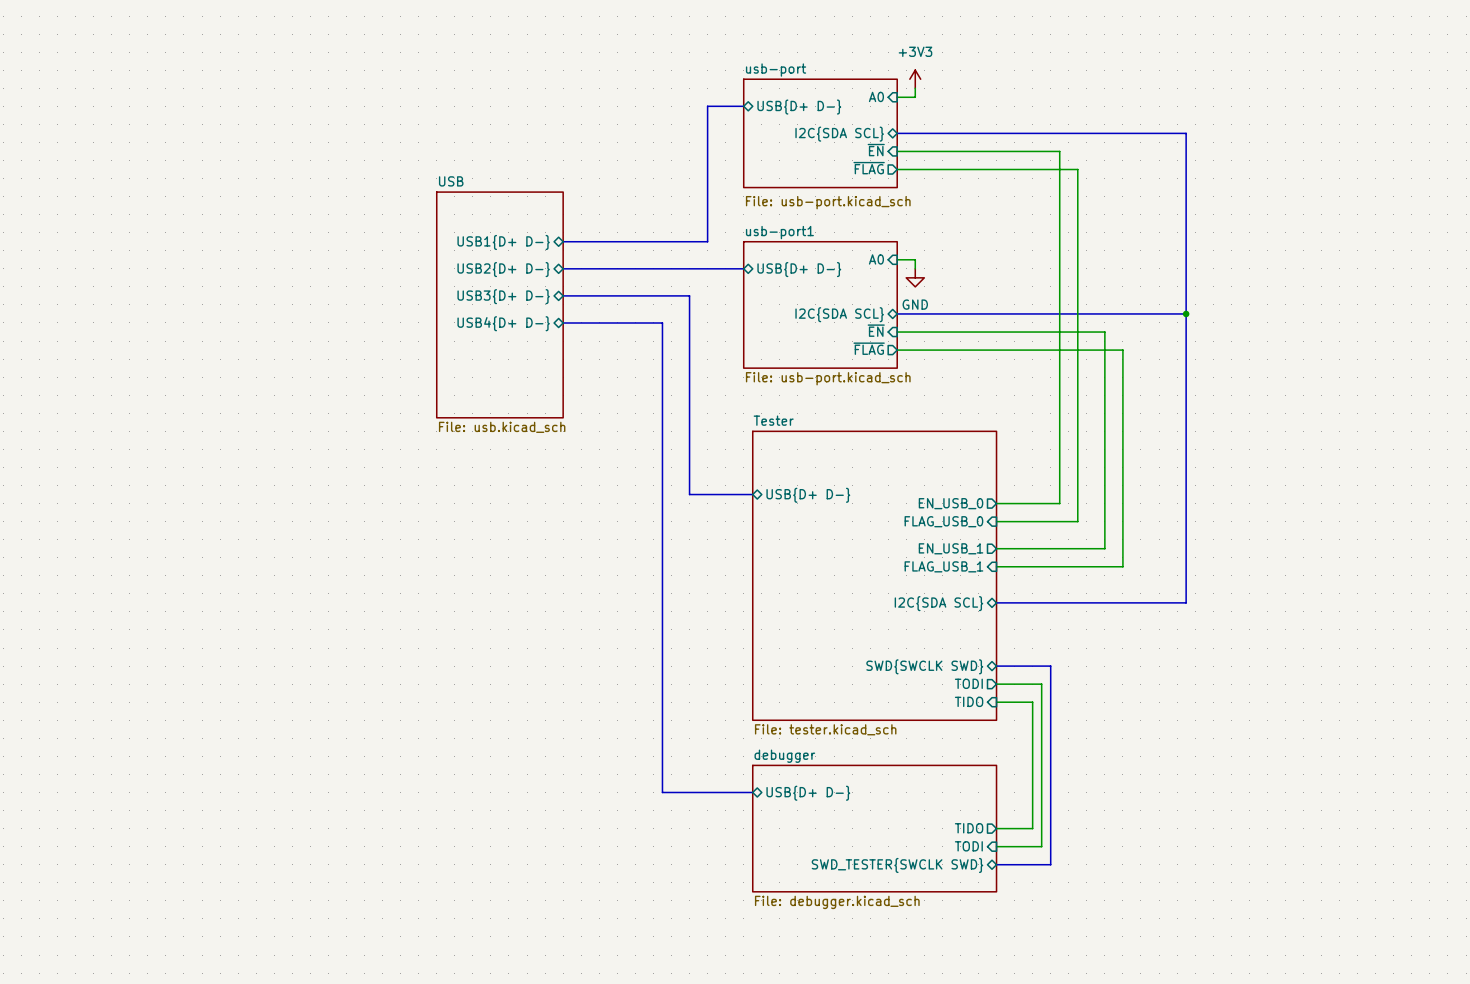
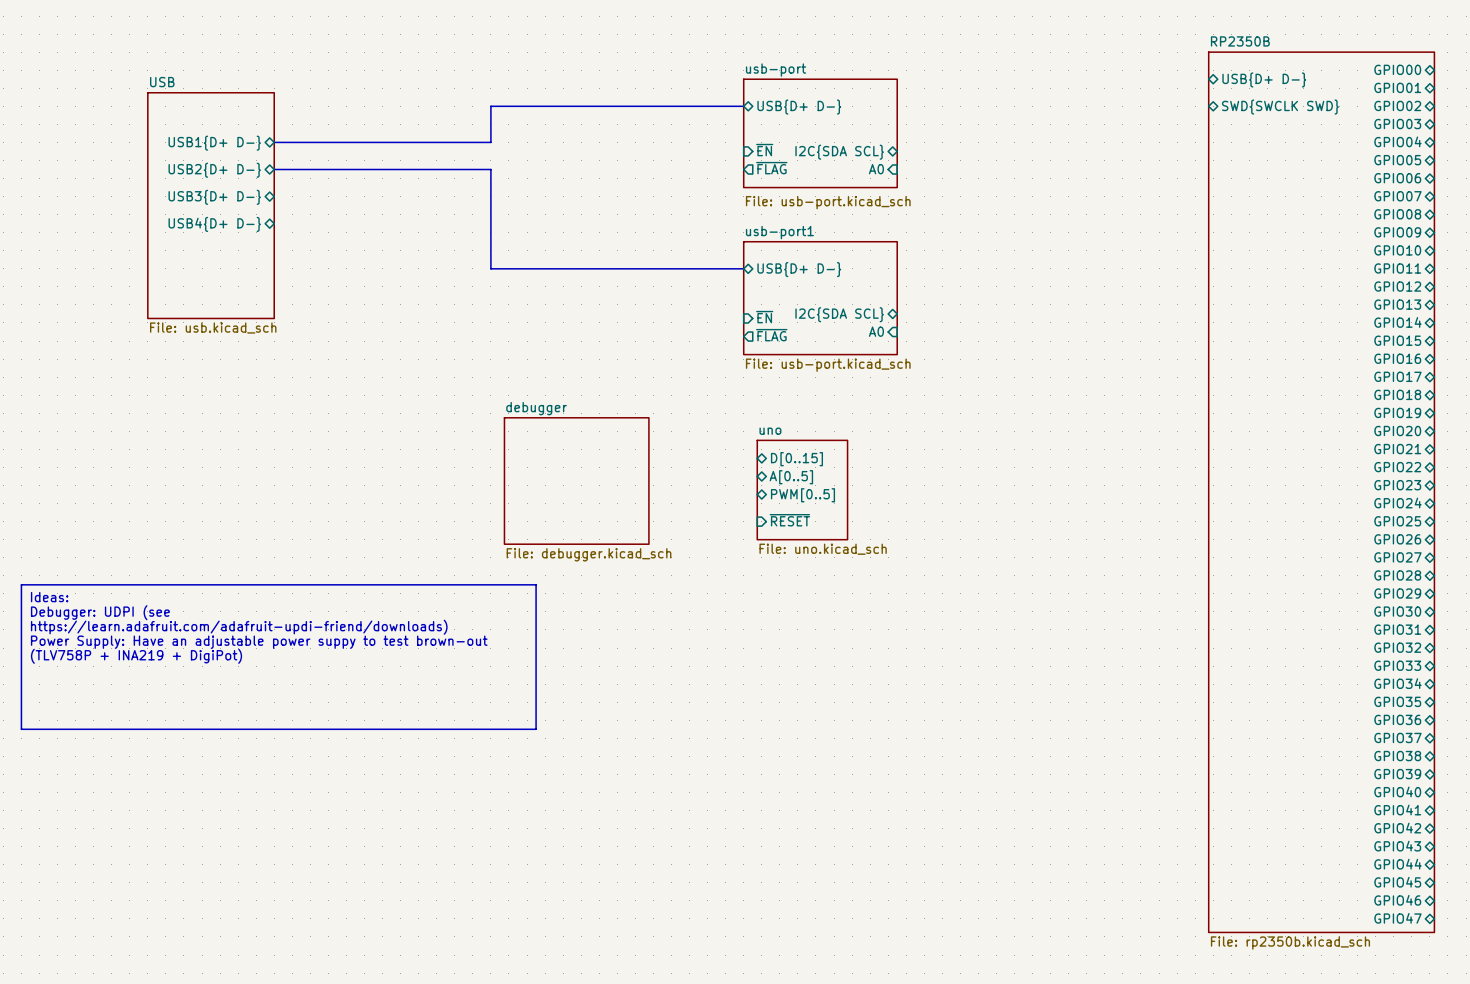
sheet pin: none -> GPIO00 (1397, 69)
power symbol: +3V3 (915, 79) -> none
sheet pin: none -> USB{D+ D-} (1264, 79)
sheet pin: none -> GPIO01 (1397, 87)
wire: (915, 88) (915, 97) (897, 97) -> none
sheet pin: A0 (876, 96) -> none
sheet pin: none -> GPIO02 (1397, 105)
bus: (707, 106) (707, 241) (563, 241) -> (707, 106) (490, 106) (490, 142) (274, 142)
sheet pin: none -> SWD{SWCLK SWD} (1280, 107)
sheet pin: none -> GPIO03 (1397, 124)
bus: (897, 133) (1186, 133) (1186, 602) (996, 602) -> none
sheet pin: I2C{SDA SCL} (839, 134) -> none
sheet pin: none -> GPIO04 (1397, 141)
sheet pin: none -> USB1{D+ D-} (214, 143)
sheet pin: none -> ~{EN} (764, 150)
sheet pin shape: input (876, 150) -> bidirectional (839, 152)
sheet pin: ~{EN} (876, 150) -> I2C{SDA SCL} (839, 152)
wire: (897, 151) (1059, 151) (1059, 503) (996, 503) -> none
sheet pin: none -> GPIO05 (1397, 160)
sheet pin: none -> ~{FLAG} (771, 168)
sheet pin shape: output (869, 168) -> input (876, 169)
sheet pin: ~{FLAG} (869, 168) -> A0 (876, 169)
bus: none -> (274, 169) (490, 169) (490, 268) (563, 268)
wire: (897, 169) (1077, 169) (1077, 521) (996, 521) -> none
sheet pin: none -> USB2{D+ D-} (214, 170)
sheet pin: none -> GPIO06 (1397, 178)
sheet pin: none -> GPIO07 (1397, 196)
sheet pin: none -> USB3{D+ D-} (214, 197)
sheet USB: none -> File: usb.kicad_sch (211, 205)
sheet pin: none -> GPIO08 (1397, 214)
sheet pin: none -> USB4{D+ D-} (214, 224)
sheet pin: none -> GPIO09 (1397, 232)
sheet usb-port1 shape: [743, 241, 898, 369] -> [743, 241, 898, 356]
sheet pin: USB1{D+ D-} (503, 242) -> none
sheet pin: none -> GPIO10 (1397, 250)
sheet pin: A0 (876, 259) -> none
wire: (897, 259) (915, 259) (915, 268) -> none
sheet pin: none -> GPIO11 (1397, 268)
sheet pin: USB2{D+ D-} (503, 269) -> none
power symbol: GND (915, 277) -> none
sheet pin: none -> GPIO12 (1397, 286)
bus: (563, 295) (689, 295) (689, 494) (752, 494) -> none
sheet pin: USB3{D+ D-} (503, 296) -> none
sheet USB: File: usb.kicad_sch (499, 304) -> none
sheet pin: none -> GPIO13 (1397, 304)
bus: (897, 313) (1186, 313) -> none
junction: (1186, 313) -> none
sheet pin: none -> ~{EN} (764, 317)
bus: (563, 322) (662, 322) (662, 792) (752, 792) -> none
sheet pin: none -> GPIO14 (1397, 322)
sheet pin: USB4{D+ D-} (503, 323) -> none
sheet pin: ~{EN} (876, 330) -> A0 (876, 331)
wire: (897, 332) (1104, 332) (1104, 548) (996, 548) -> none
sheet pin: none -> GPIO15 (1397, 340)
sheet pin rotation: 0° (869, 348) -> 180° (771, 335)
wire: (897, 350) (1122, 350) (1122, 566) (996, 566) -> none
sheet pin: none -> GPIO16 (1397, 358)
sheet pin: none -> GPIO17 (1397, 376)
sheet pin: none -> GPIO18 (1397, 394)
sheet pin: none -> GPIO19 (1397, 412)
sheet pin: none -> GPIO20 (1397, 431)
sheet pin: none -> GPIO21 (1397, 449)
sheet pin: none -> D[0..15] (796, 459)
sheet pin: none -> GPIO22 (1397, 467)
sheet pin: none -> A[0..5] (791, 477)
sheet debugger: none -> File: debugger.kicad_sch (576, 481)
sheet pin: none -> GPIO23 (1397, 485)
sheet uno: none -> File: uno.kicad_sch (802, 490)
sheet RP2350B: none -> File: rp2350b.kicad_sch (1321, 492)
sheet pin: USB{D+ D-} (808, 495) -> PWM[0..5] (802, 495)
sheet pin: EN_USB_0 (951, 503) -> none
sheet pin: none -> GPIO24 (1397, 503)
sheet pin: none -> ~{RESET} (789, 520)
sheet pin: FLAG_USB_0 (943, 521) -> none
sheet pin: none -> GPIO25 (1397, 521)
sheet pin: none -> GPIO26 (1397, 539)
sheet pin: EN_USB_1 (951, 548) -> none
sheet pin: none -> GPIO27 (1397, 557)
sheet pin: FLAG_USB_1 (943, 566) -> none
sheet Tester: File: tester.kicad_sch (874, 575) -> none
sheet pin: none -> GPIO28 (1397, 575)
line: none -> (21, 584) (536, 584) (536, 729) (21, 729) (21, 584)
sheet pin: none -> GPIO29 (1397, 593)
text: none -> Ideas: (49, 597)
sheet pin: I2C{SDA SCL} (938, 603) -> none
sheet pin: none -> GPIO30 (1397, 611)
text: none -> Debugger: UDPI (see (100, 612)
text: none -> https://learn.adafruit.com/adafruit-updi-friend/downloads) (239, 627)
sheet pin: none -> GPIO31 (1397, 629)
text: none -> Power Supply: Have an adjustable power suppy to test brown-out (259, 642)
sheet pin: none -> GPIO32 (1397, 647)
text: none -> (TLV758P + INA219 + DigiPot) (136, 656)
sheet pin: none -> GPIO33 (1397, 665)
sheet pin: SWD{SWCLK SWD} (924, 666) -> none
bus: (996, 666) (1050, 666) (1050, 864) (996, 864) -> none
sheet pin: TODI (968, 683) -> none
sheet pin: none -> GPIO34 (1397, 683)
wire: (996, 684) (1041, 684) (1041, 846) (996, 846) -> none
sheet pin: TIDO (969, 701) -> none
sheet pin: none -> GPIO35 (1397, 701)
wire: (996, 702) (1032, 702) (1032, 828) (996, 828) -> none
sheet pin: none -> GPIO36 (1397, 719)
sheet pin: none -> GPIO37 (1397, 737)
sheet pin: none -> GPIO38 (1397, 756)
sheet pin: none -> GPIO39 (1397, 774)
sheet pin: none -> GPIO40 (1397, 791)
sheet pin: USB{D+ D-} (808, 793) -> none
sheet pin: none -> GPIO41 (1397, 809)
sheet debugger: File: debugger.kicad_sch (874, 828) -> none
sheet pin: TIDO (969, 828) -> none
sheet pin: none -> GPIO42 (1397, 828)
sheet pin: TODI (968, 846) -> none
sheet pin: none -> GPIO43 (1397, 846)
sheet pin: none -> GPIO44 (1397, 864)
sheet pin: SWD_TESTER{SWCLK SWD} (897, 865) -> none
sheet pin: none -> GPIO45 (1397, 882)
sheet pin: none -> GPIO46 (1397, 900)
sheet pin: none -> GPIO47 (1397, 918)

